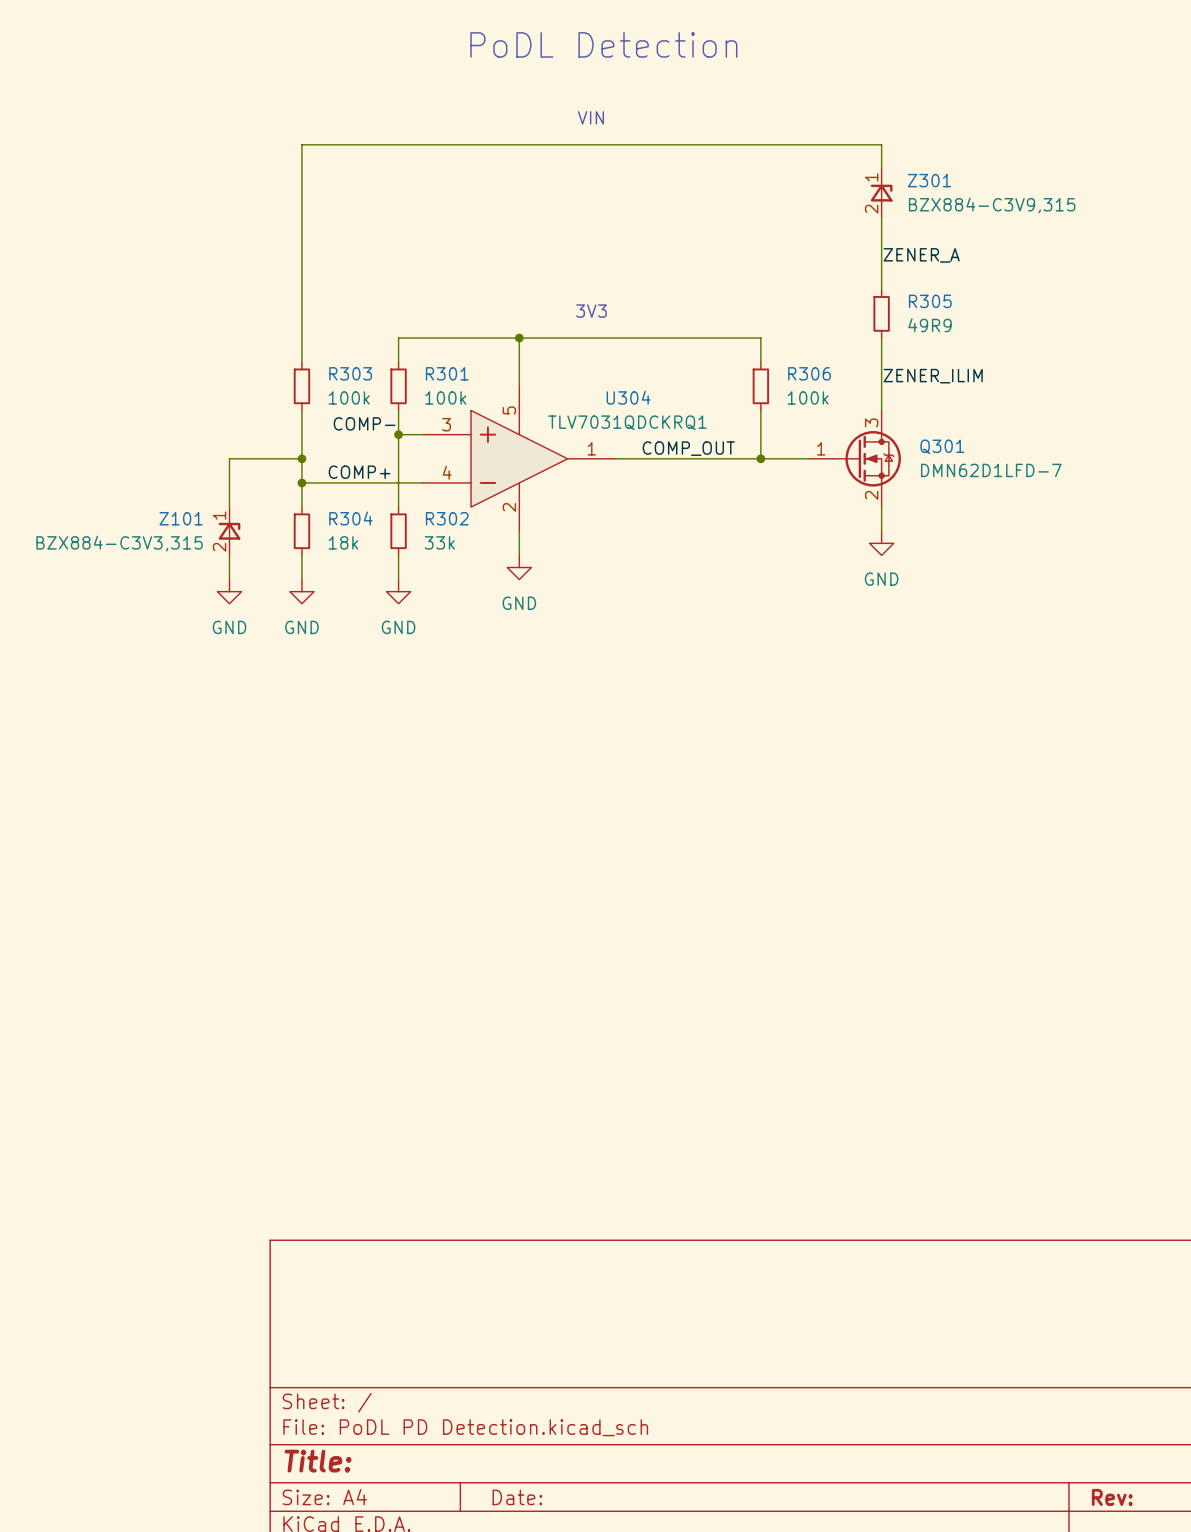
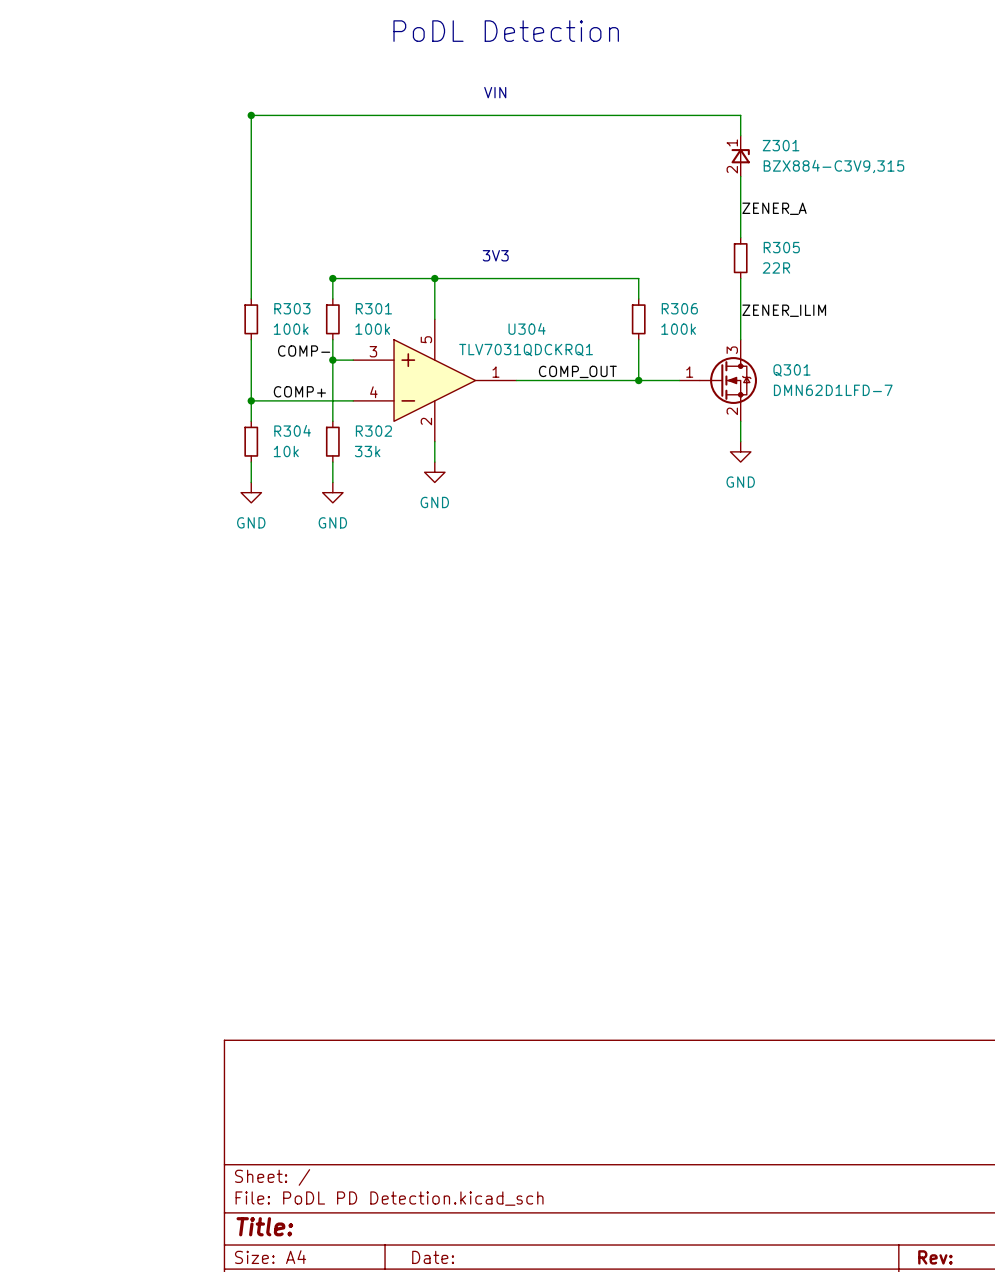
junction: none -> (251, 115)
R305 value: 49R9 (930, 325) -> 22R (776, 267)
junction: none -> (332, 278)
wire: (301, 458) (229, 458) (229, 507) -> none
junction: (301, 458) -> none
Z101: BZX884-C3V3,315 (229, 531) -> none
R304 value: 18k (343, 542) -> 10k (286, 451)
wire: (229, 555) (229, 579) -> none
power symbol: GND (229, 591) -> none

